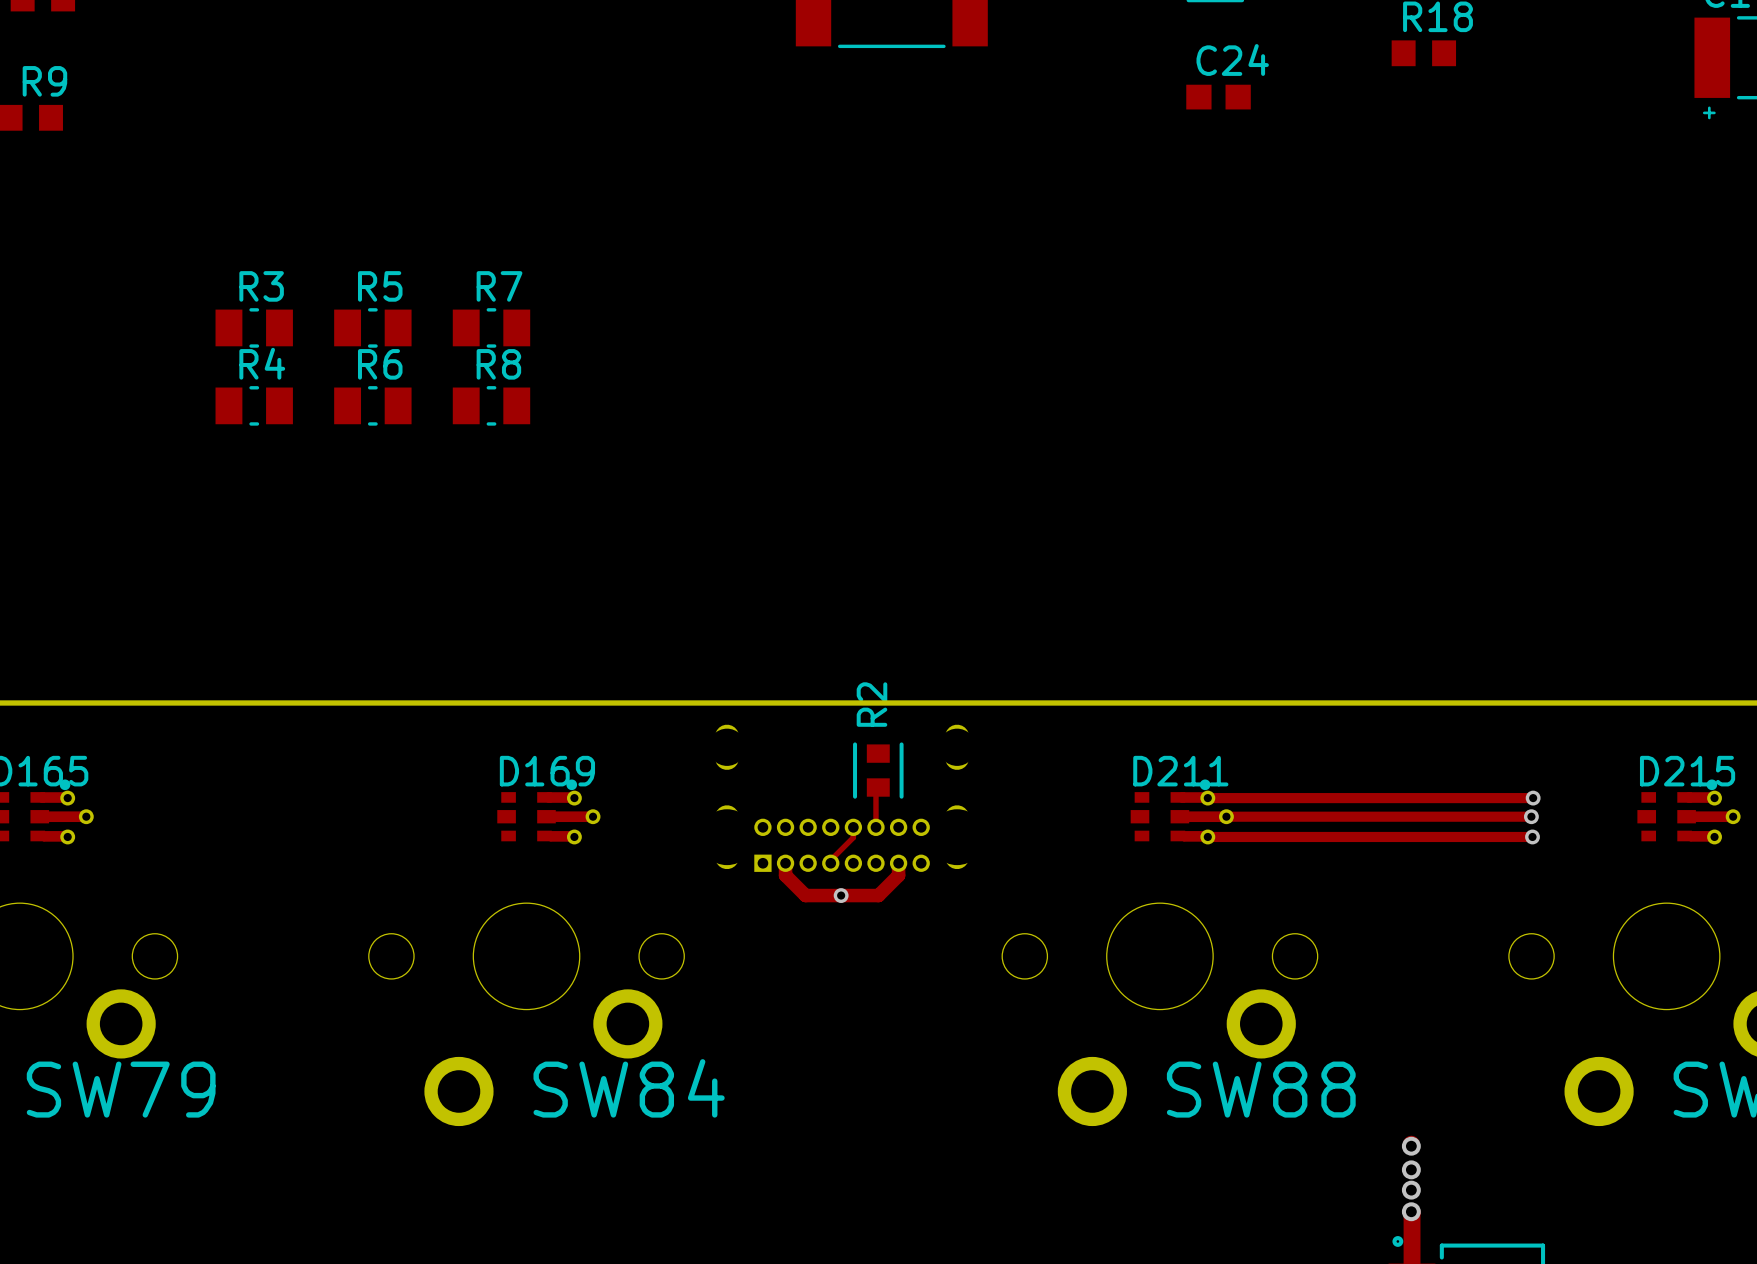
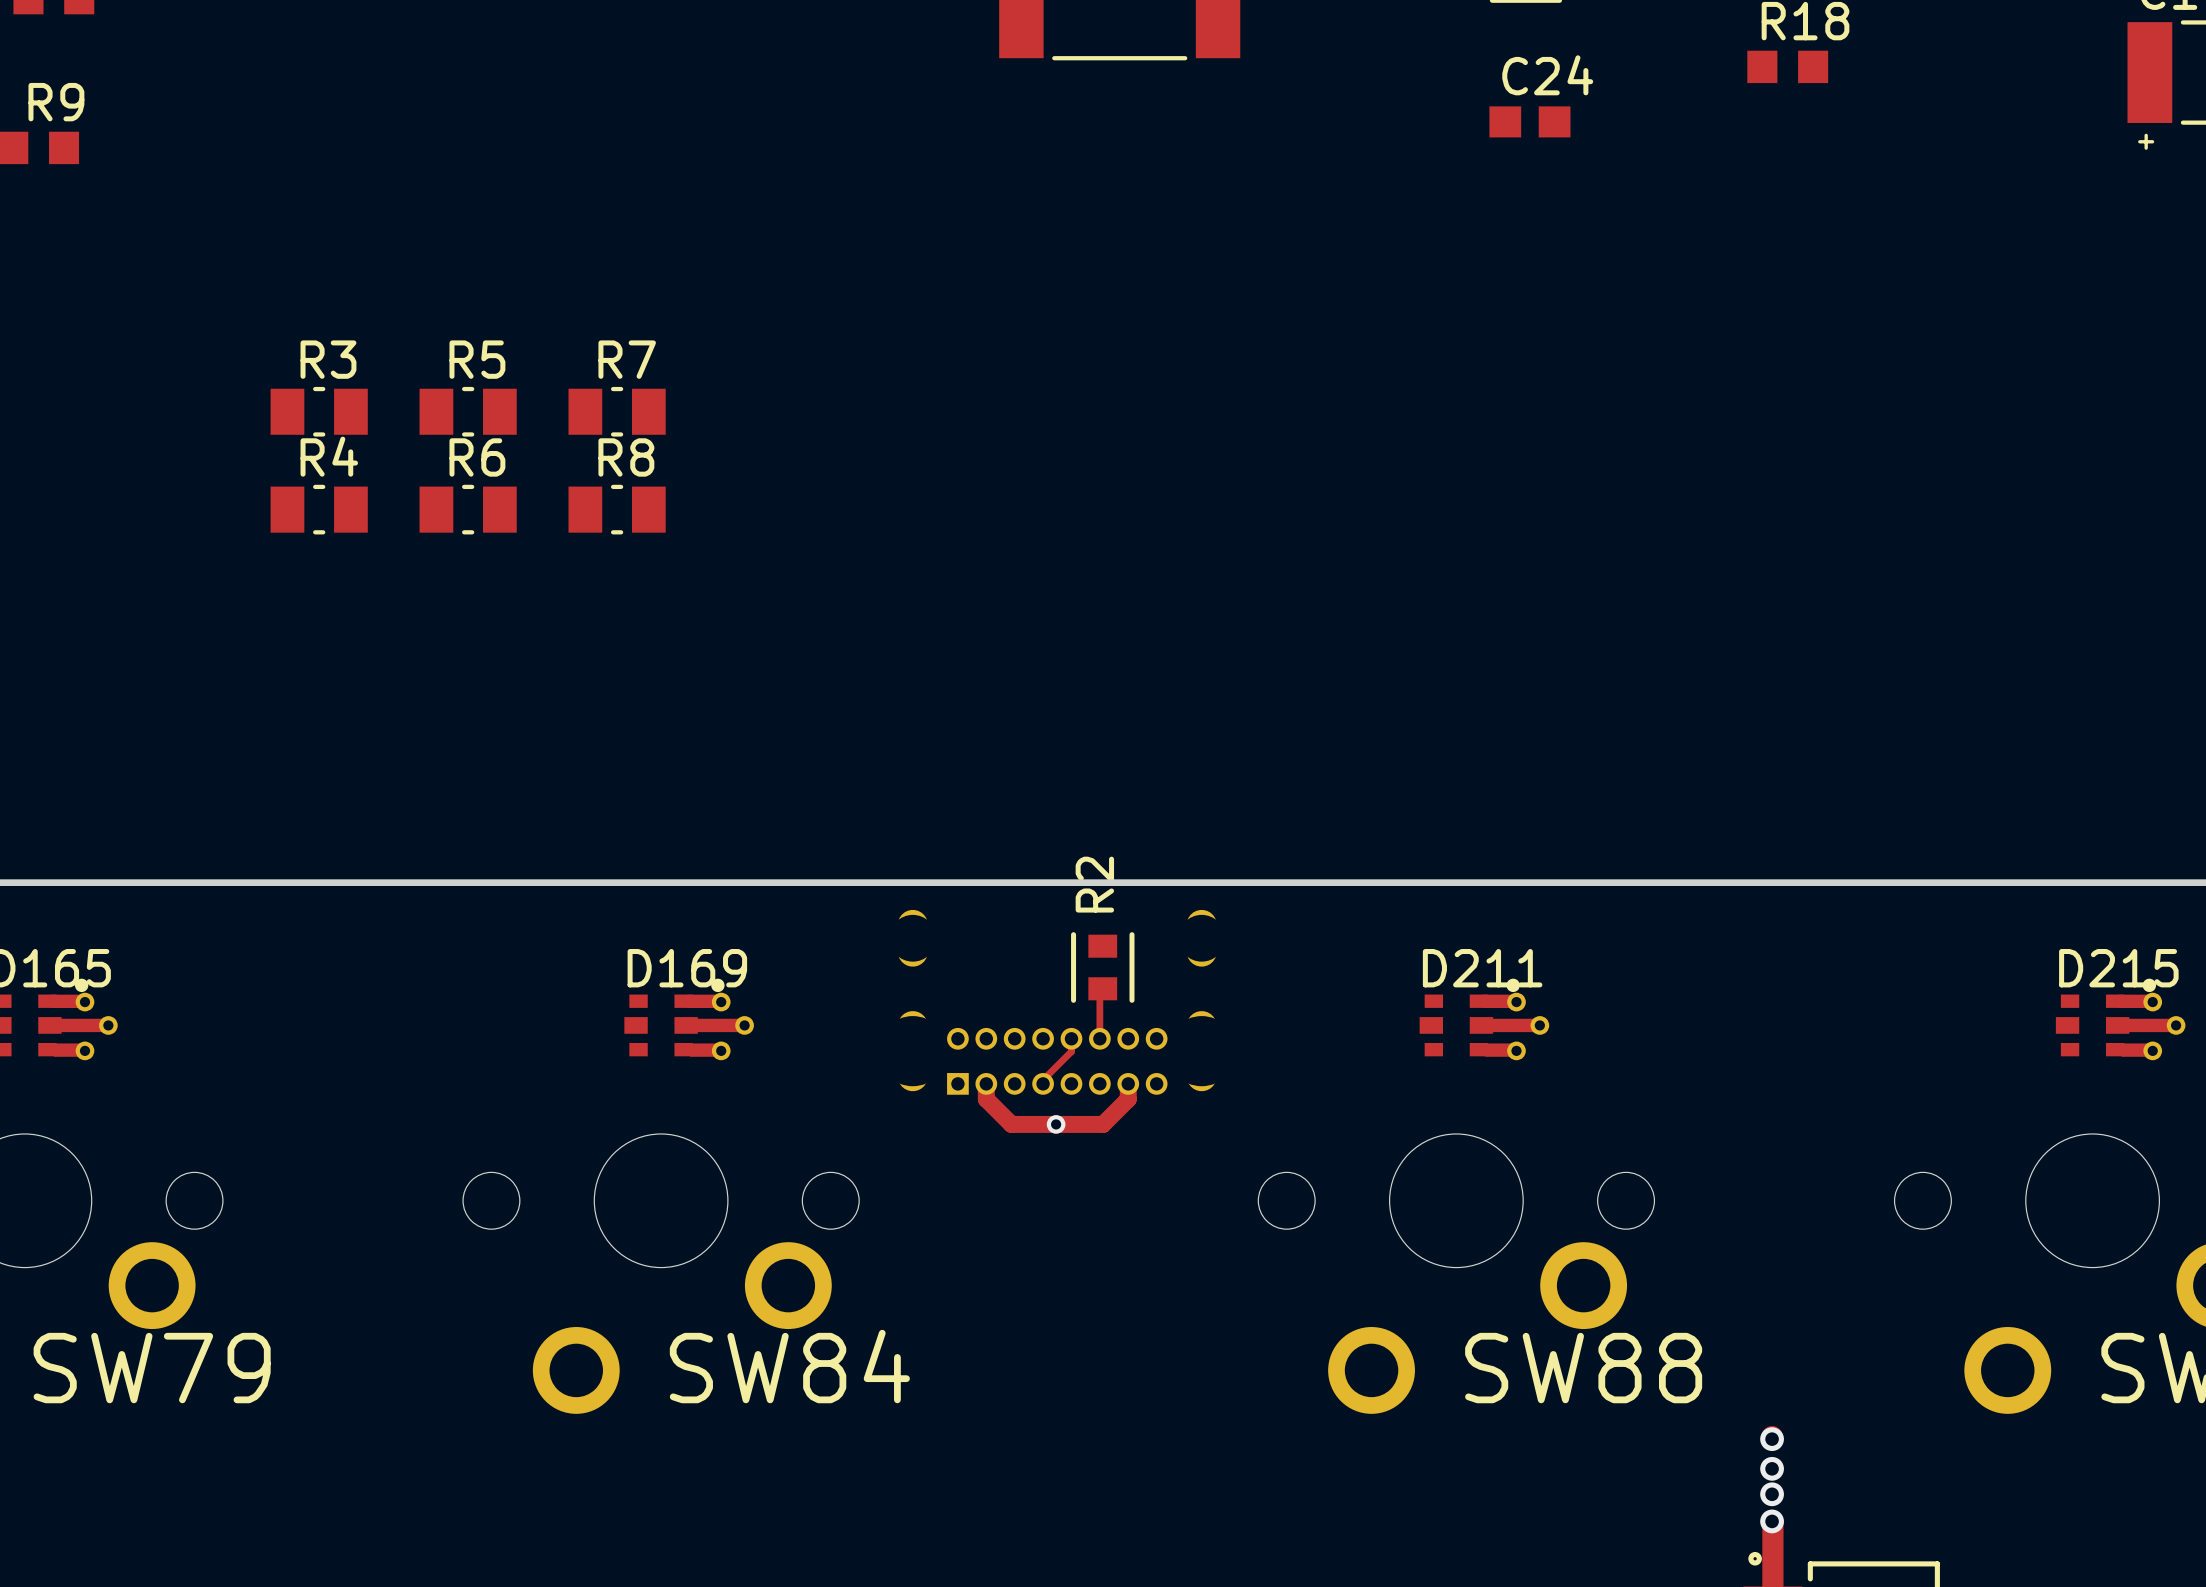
track: (1207, 798) (1533, 798) -> none
via: (1533, 798) -> none
track: (1226, 816) (1531, 816) -> none
via: (1531, 816) -> none
track: (1207, 836) (1532, 836) -> none
via: (1532, 836) -> none

